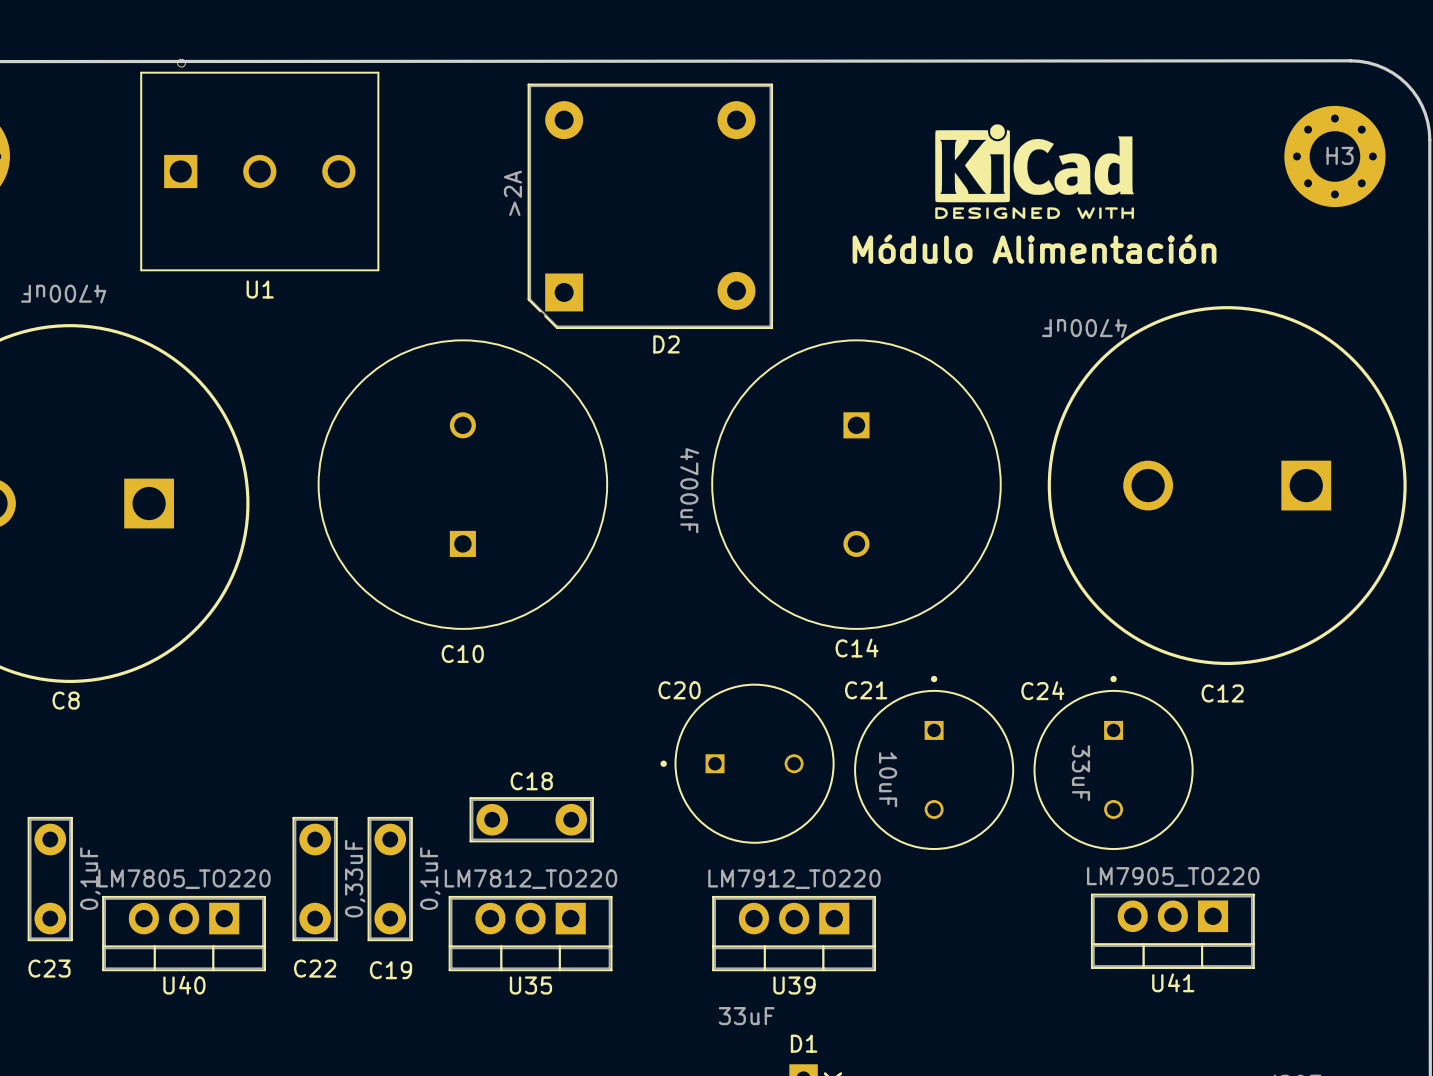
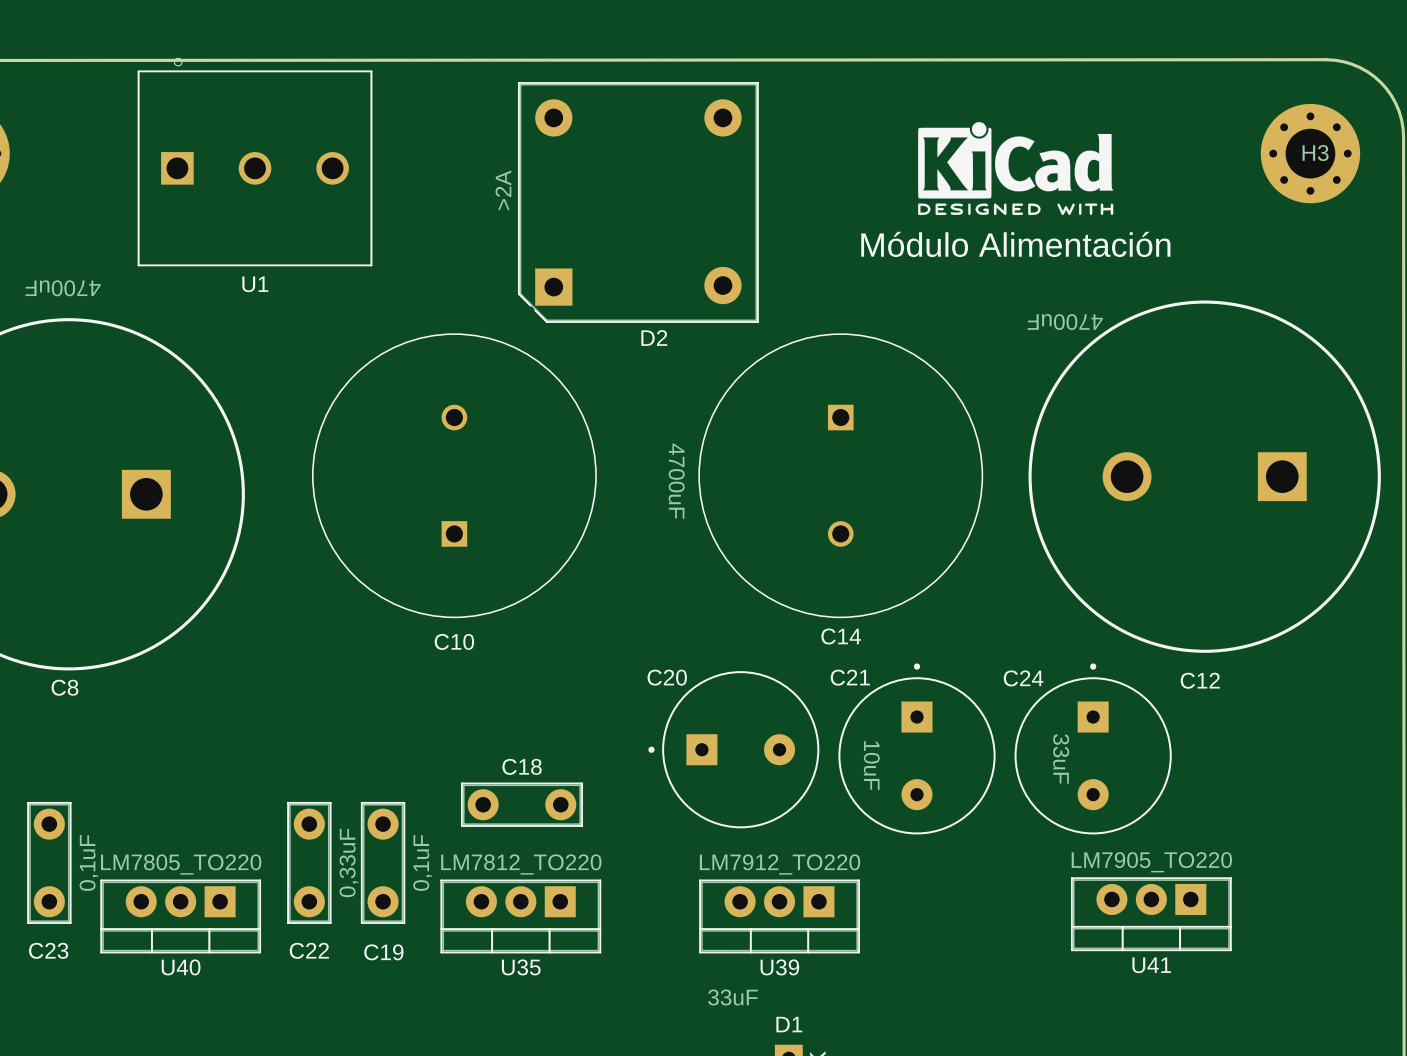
C21 footprint: [854, 675, 1015, 851] -> [838, 663, 996, 835]
C24 footprint: [1033, 675, 1194, 851] -> [1014, 663, 1172, 835]
C20 footprint: [660, 683, 835, 844] -> [648, 671, 820, 829]
U41 footprint: [1090, 893, 1255, 969] -> [1070, 877, 1232, 952]
U40 footprint: [102, 895, 266, 972] -> [100, 879, 262, 954]
U35 footprint: [448, 895, 613, 972] -> [440, 879, 602, 954]
U39 footprint: [712, 895, 876, 972] -> [699, 879, 860, 954]

